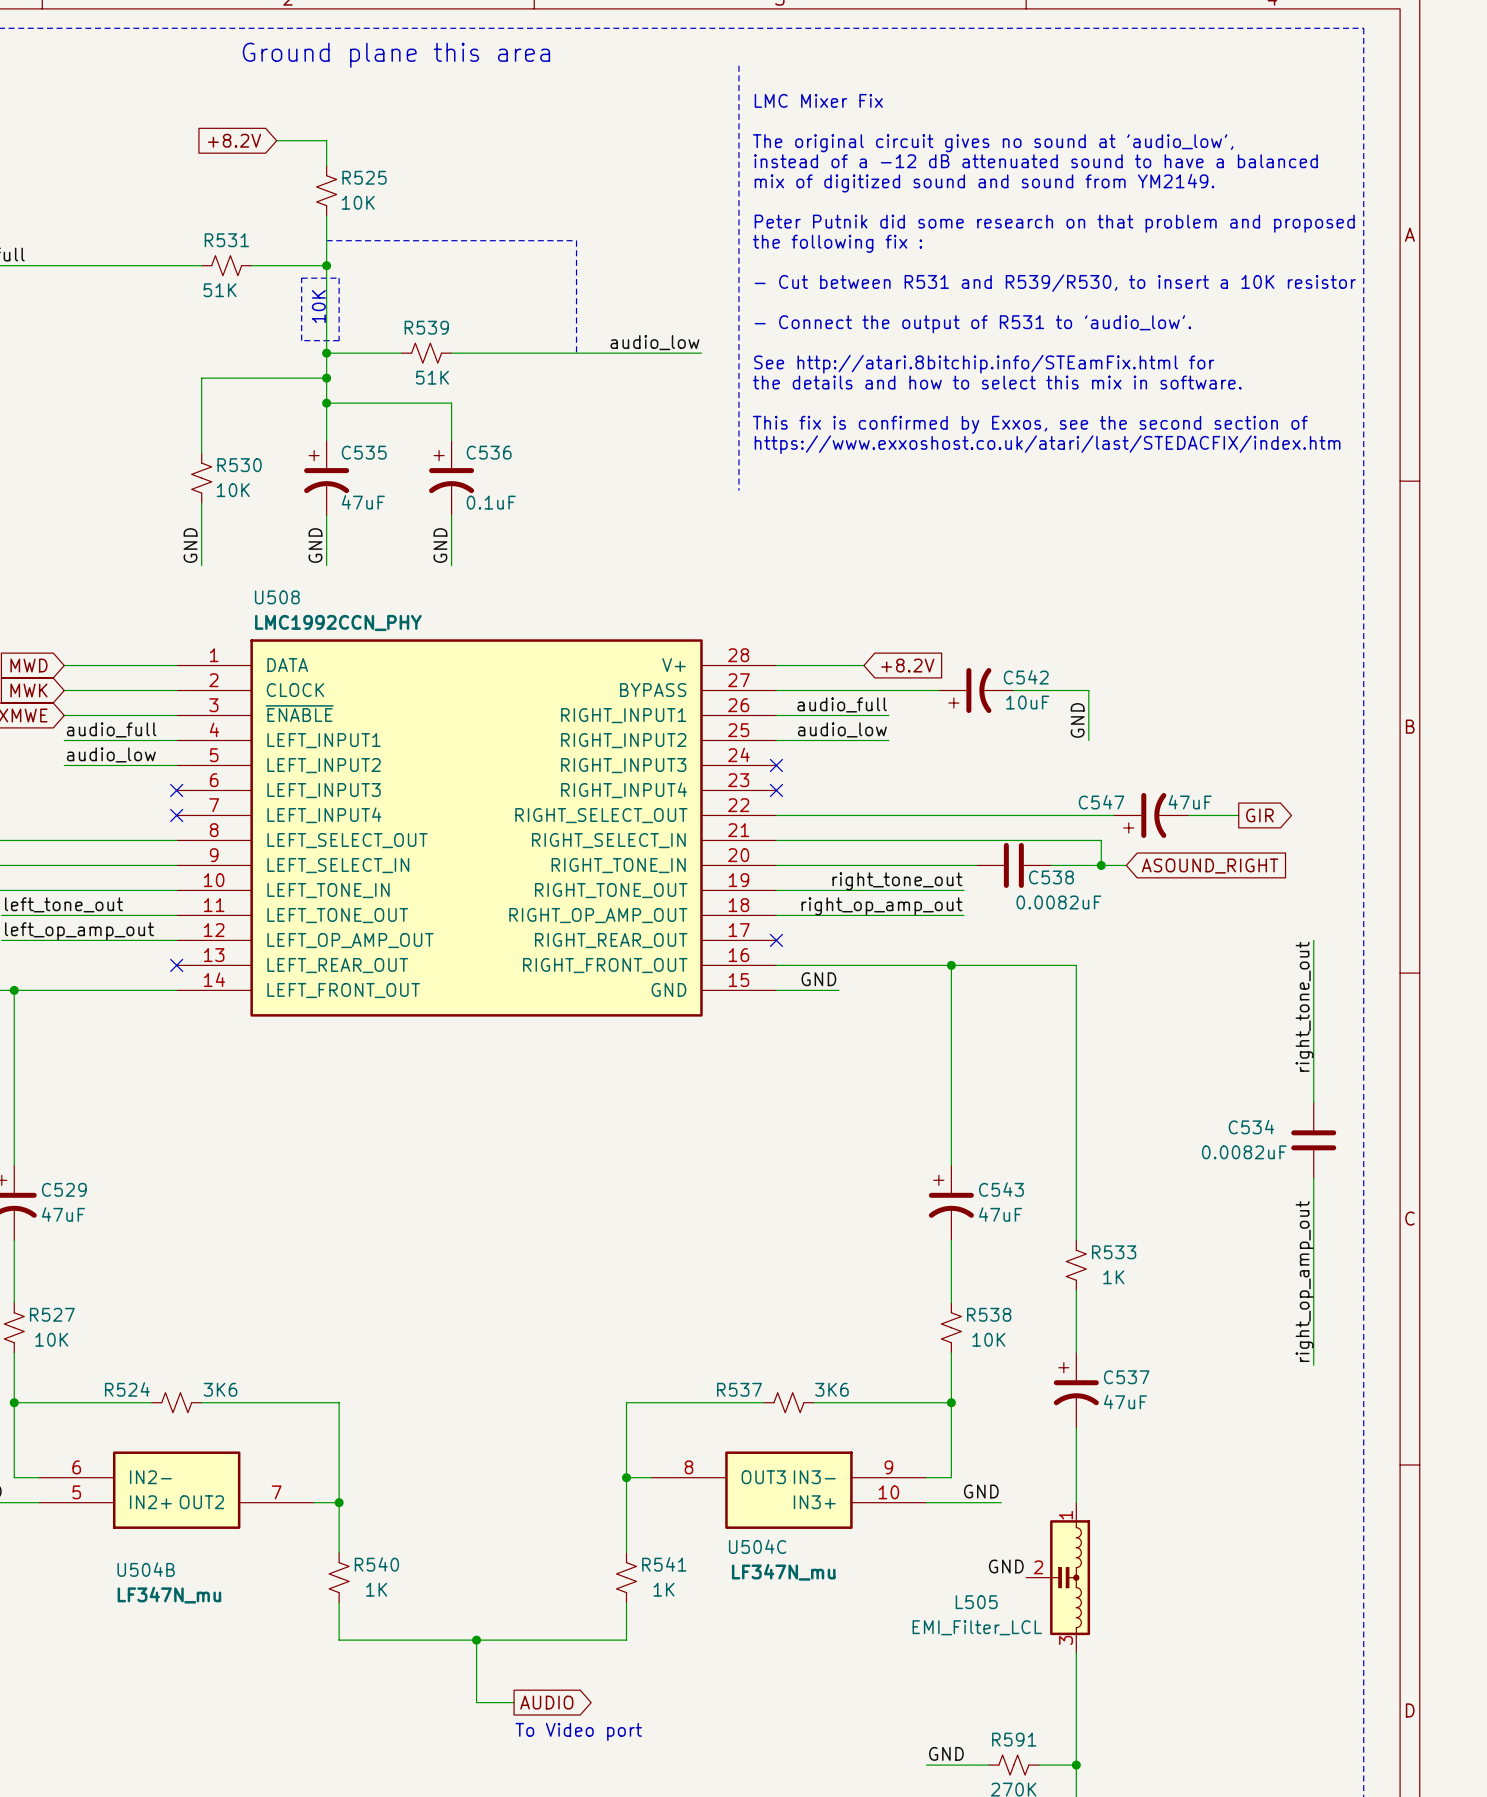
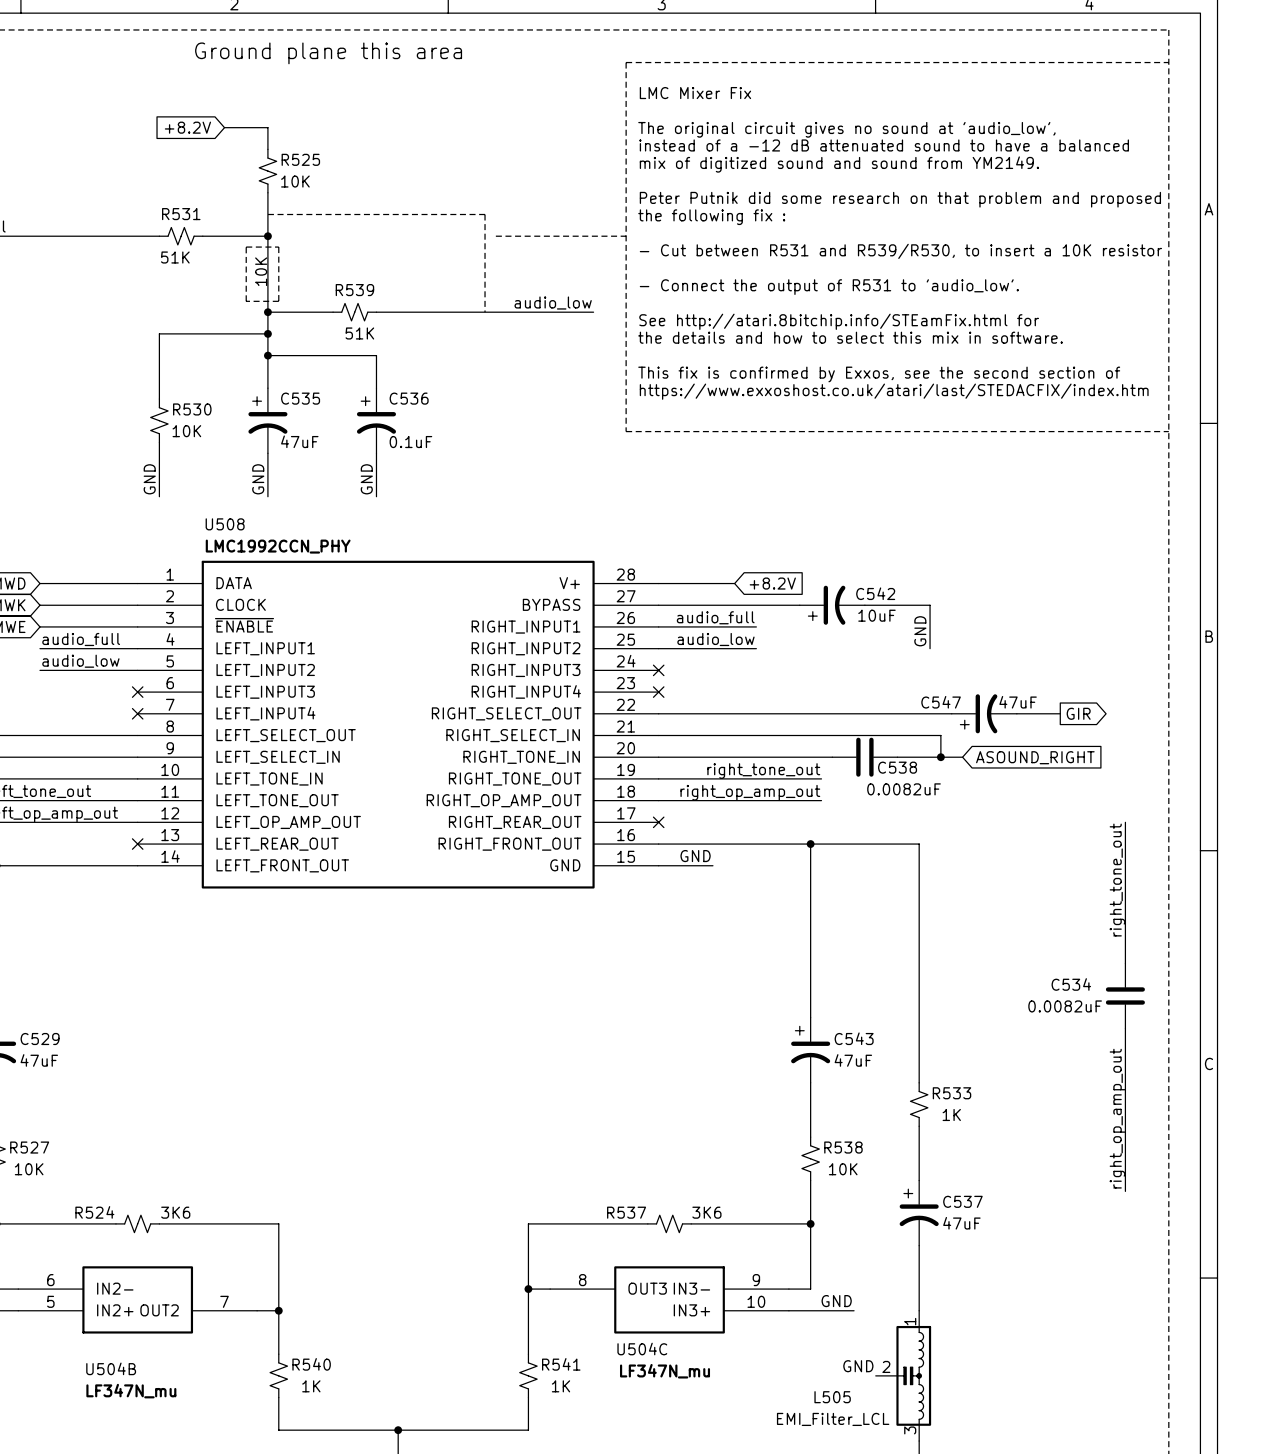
line: none -> (626, 62) (1168, 62)
line: none -> (495, 236) (626, 236)
line: none -> (626, 431) (1168, 431)

